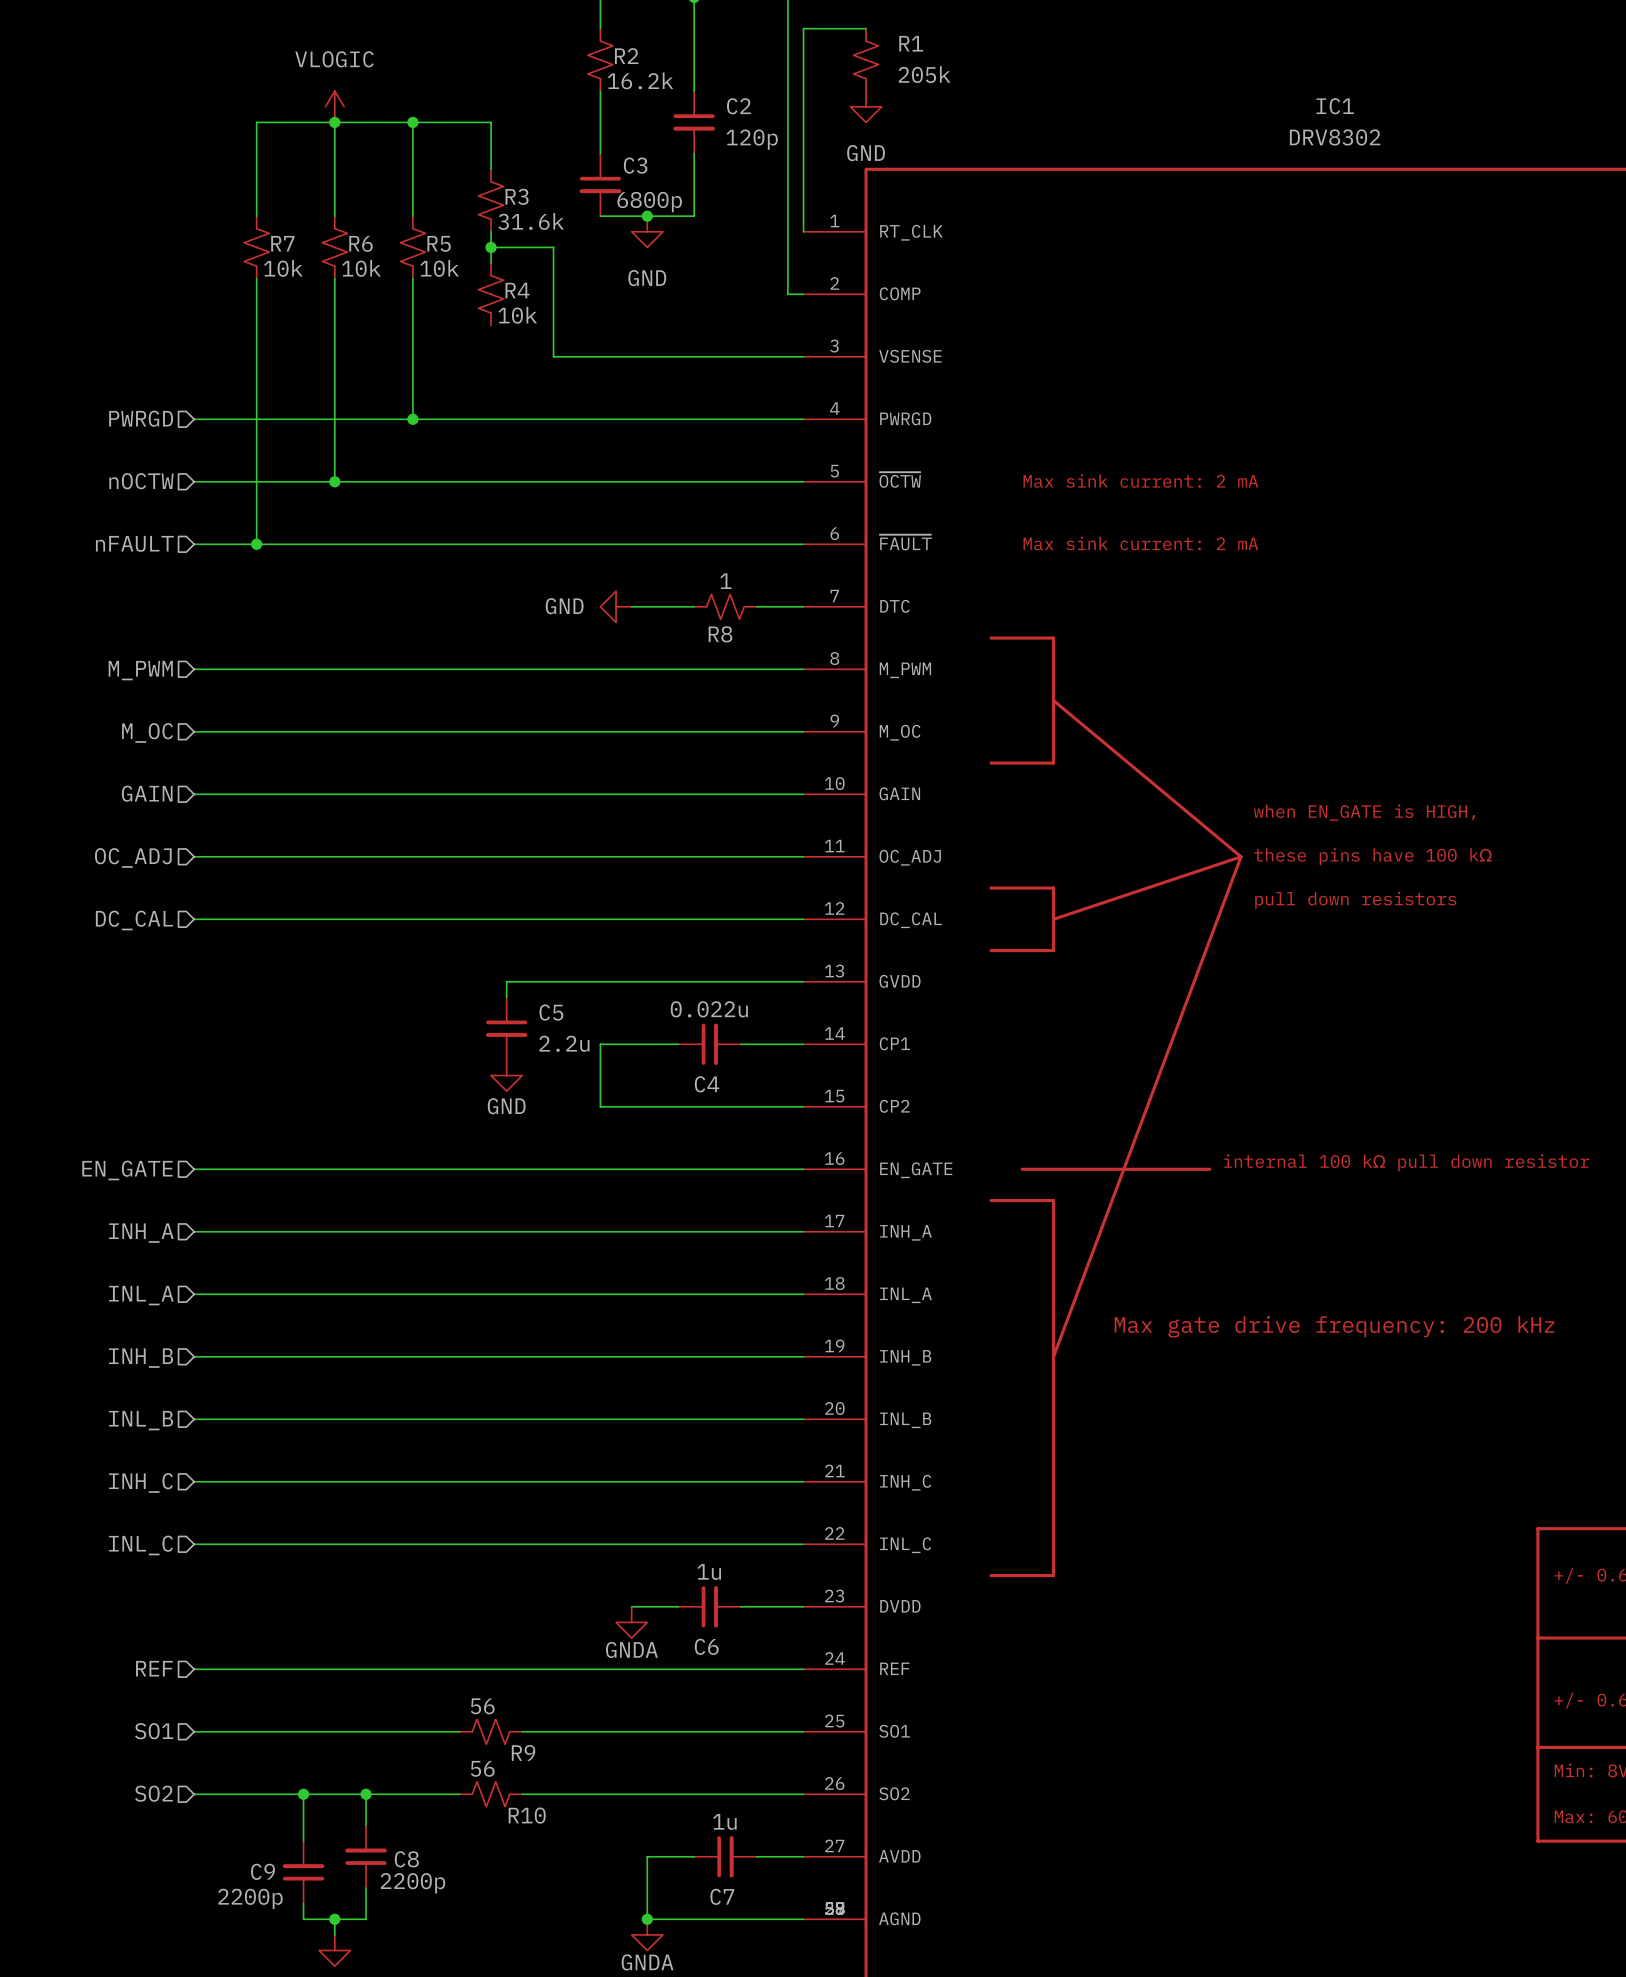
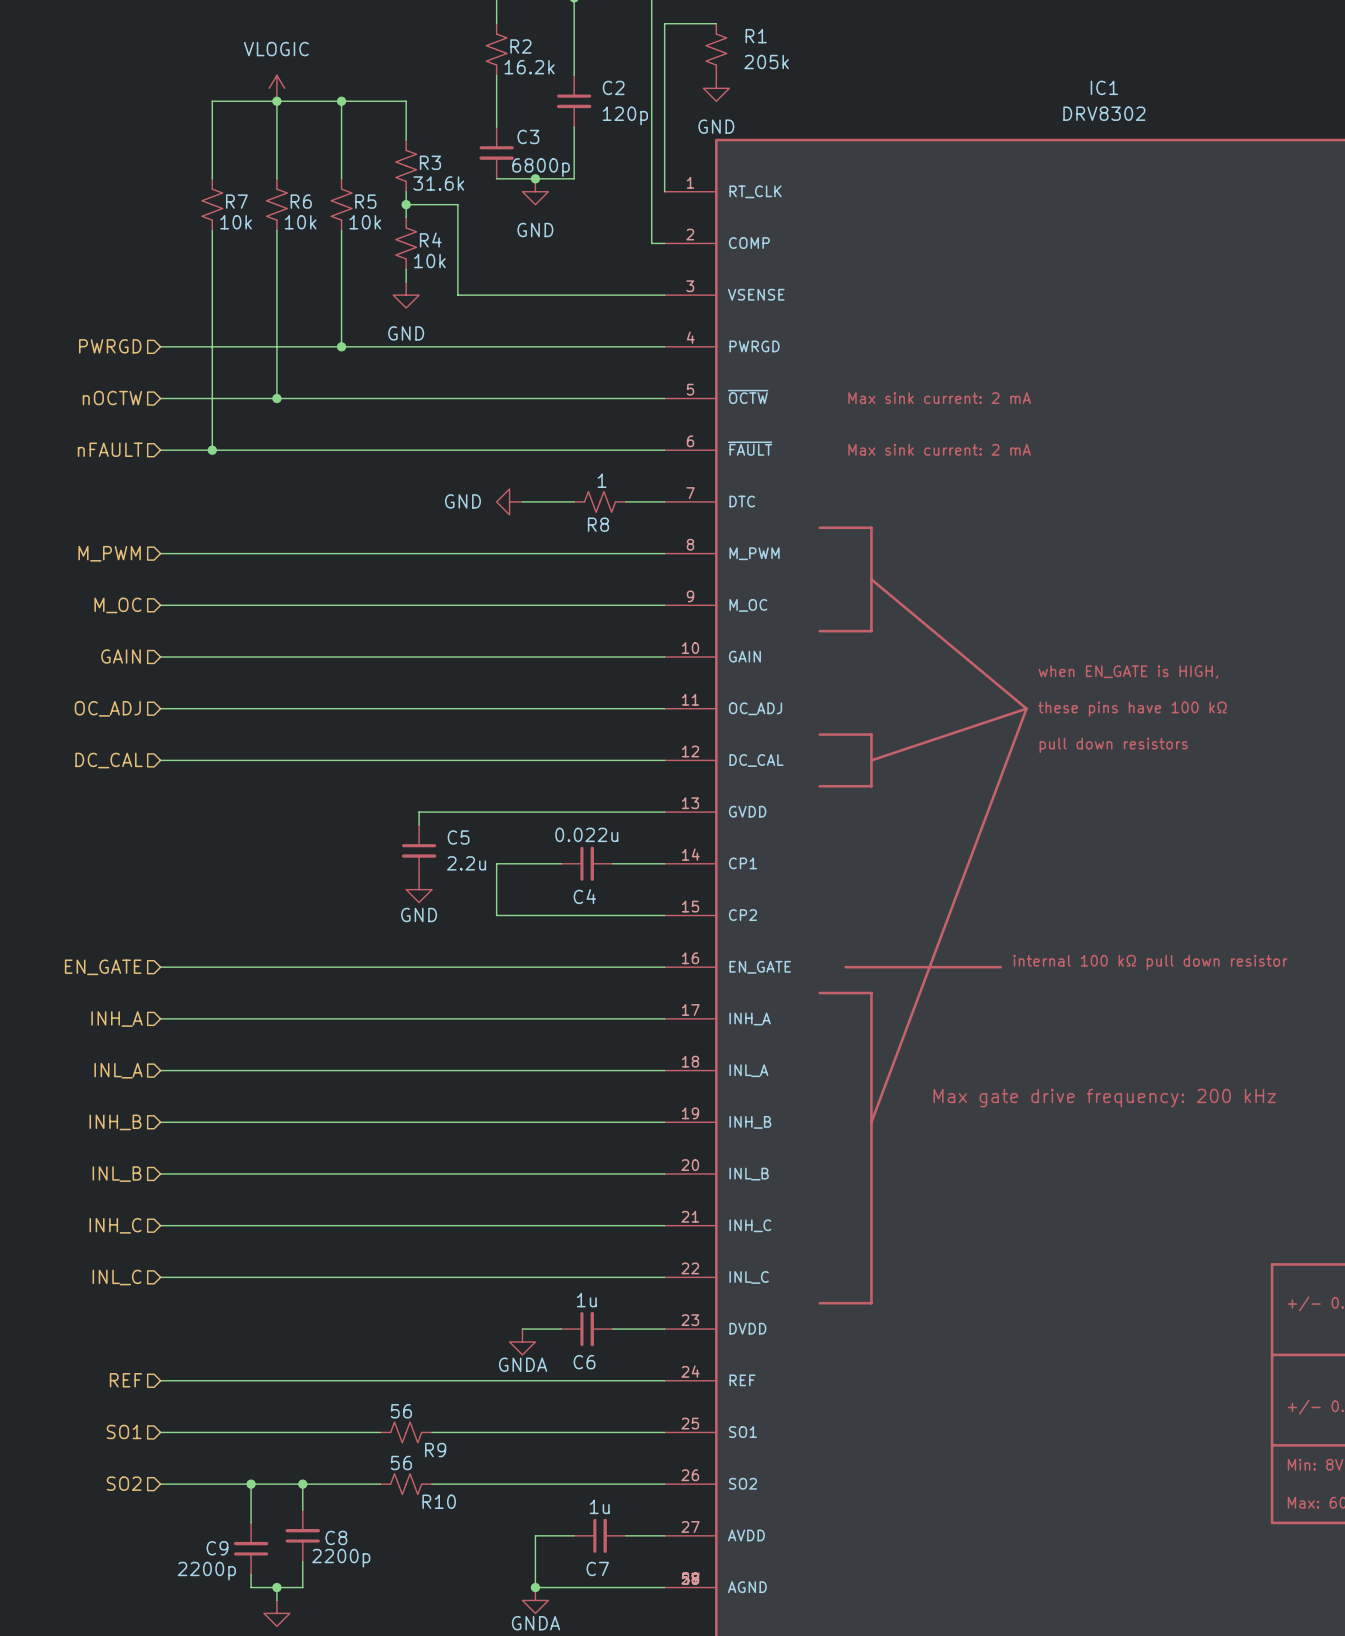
wire: none -> (406, 269) (406, 282)
power symbol: none -> GND (406, 295)

